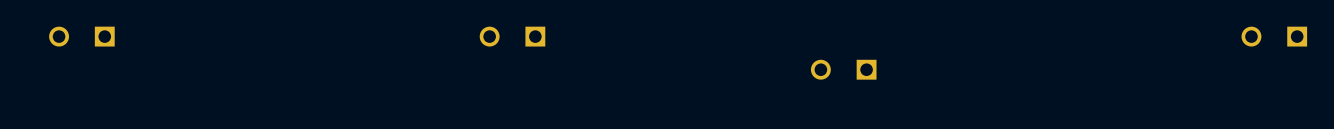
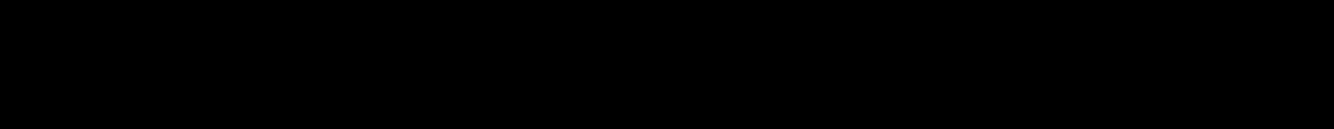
part: (81, 36) -> none
part: (512, 36) -> none
part: (1274, 36) -> none
part: (843, 69) -> none

